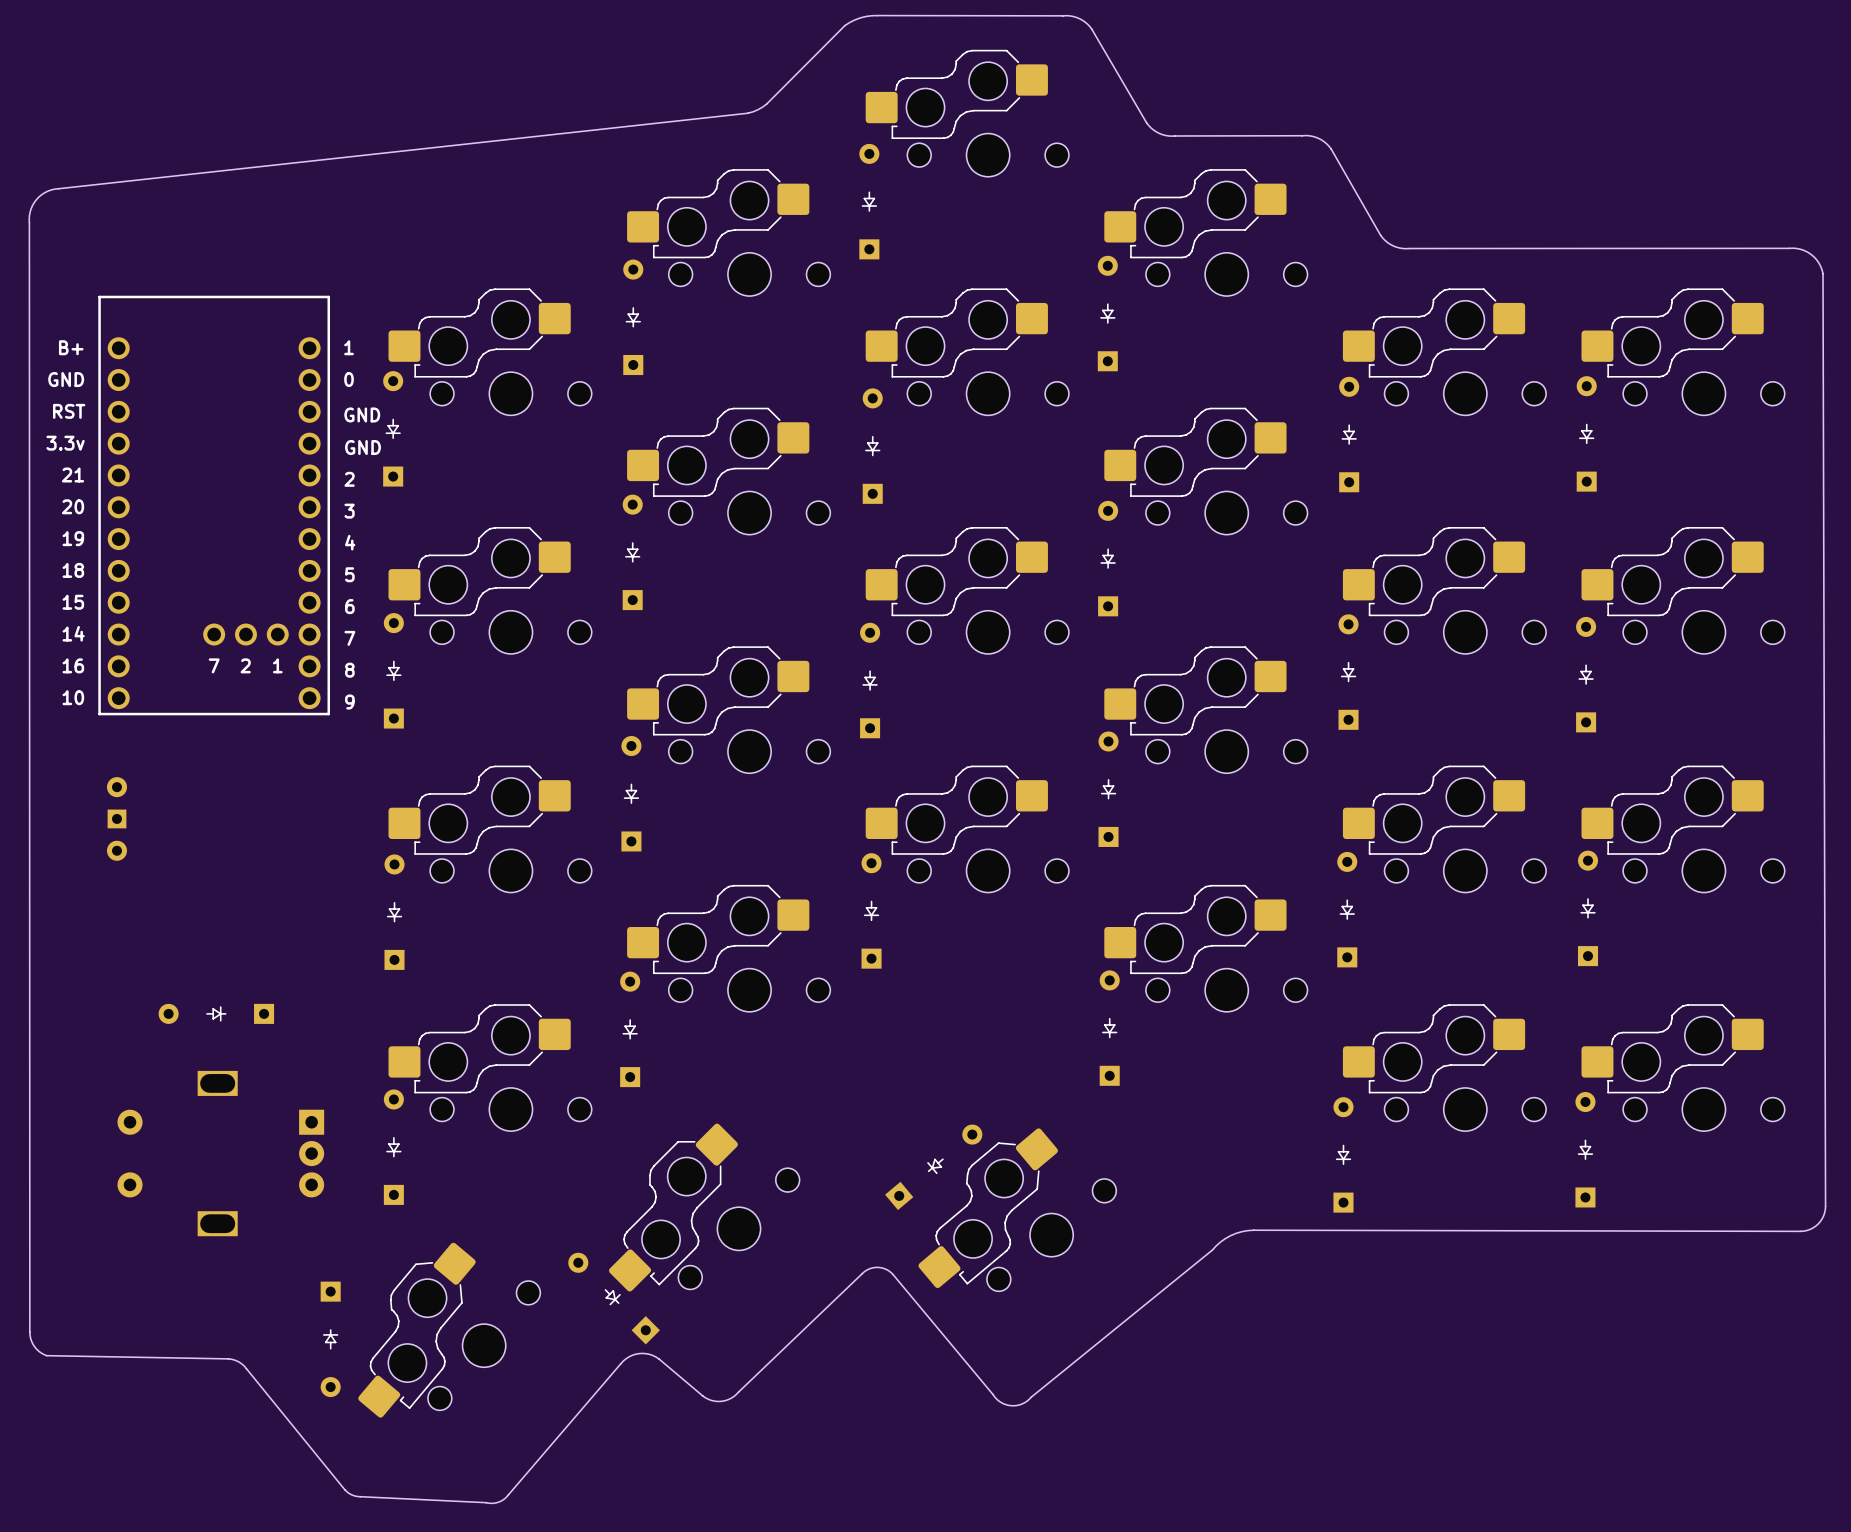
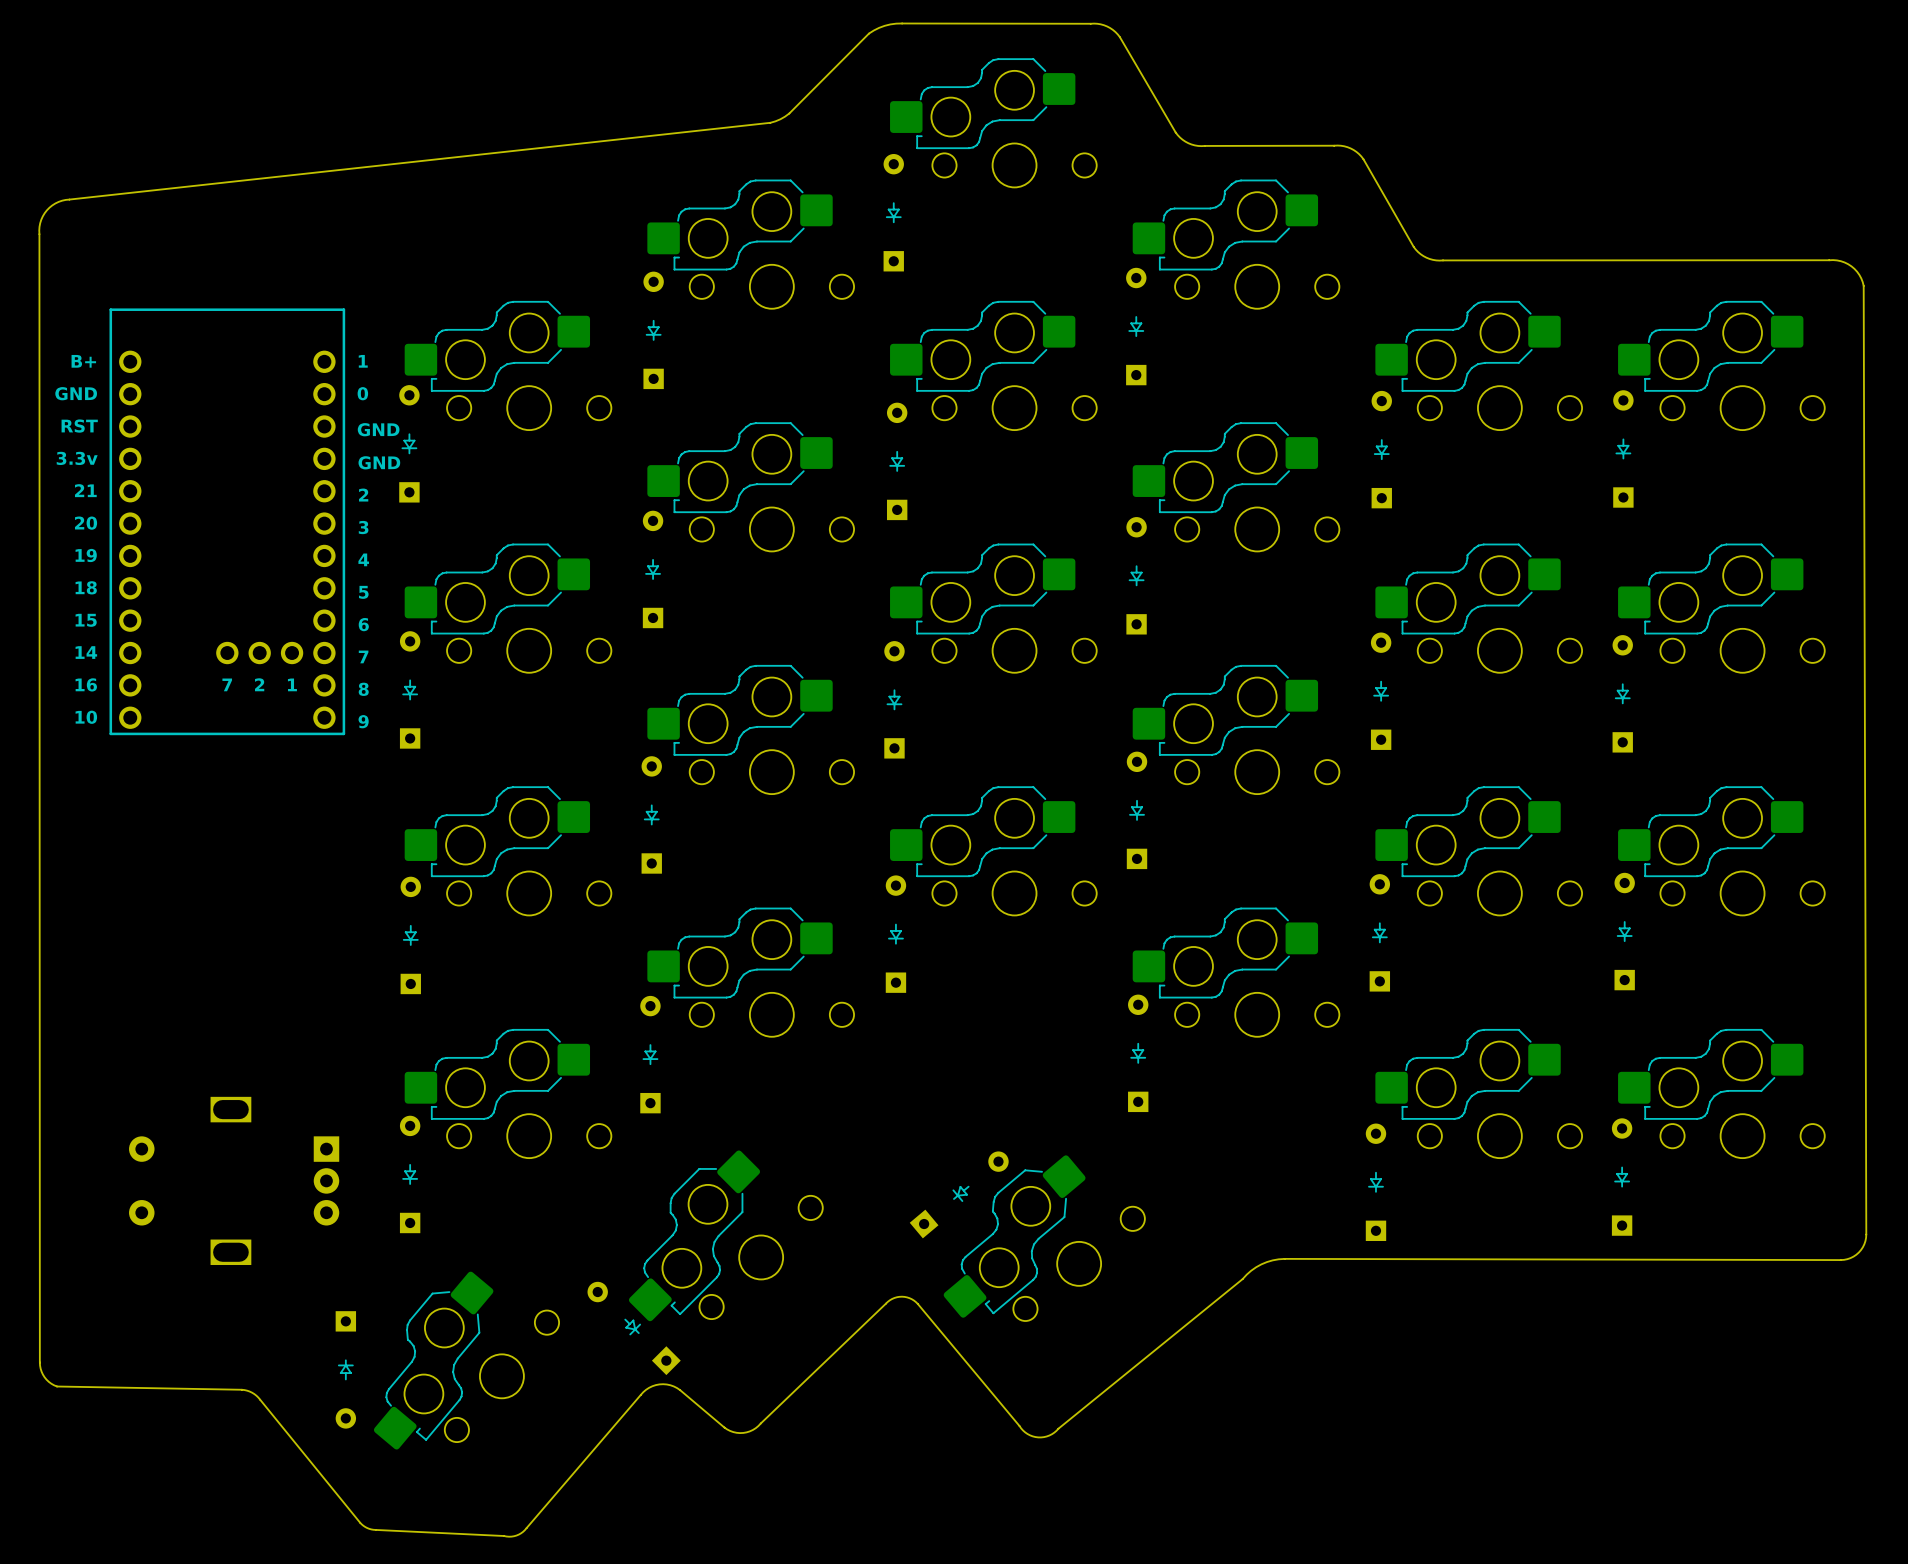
part: (117, 818) -> none
part: (216, 1013) -> none

